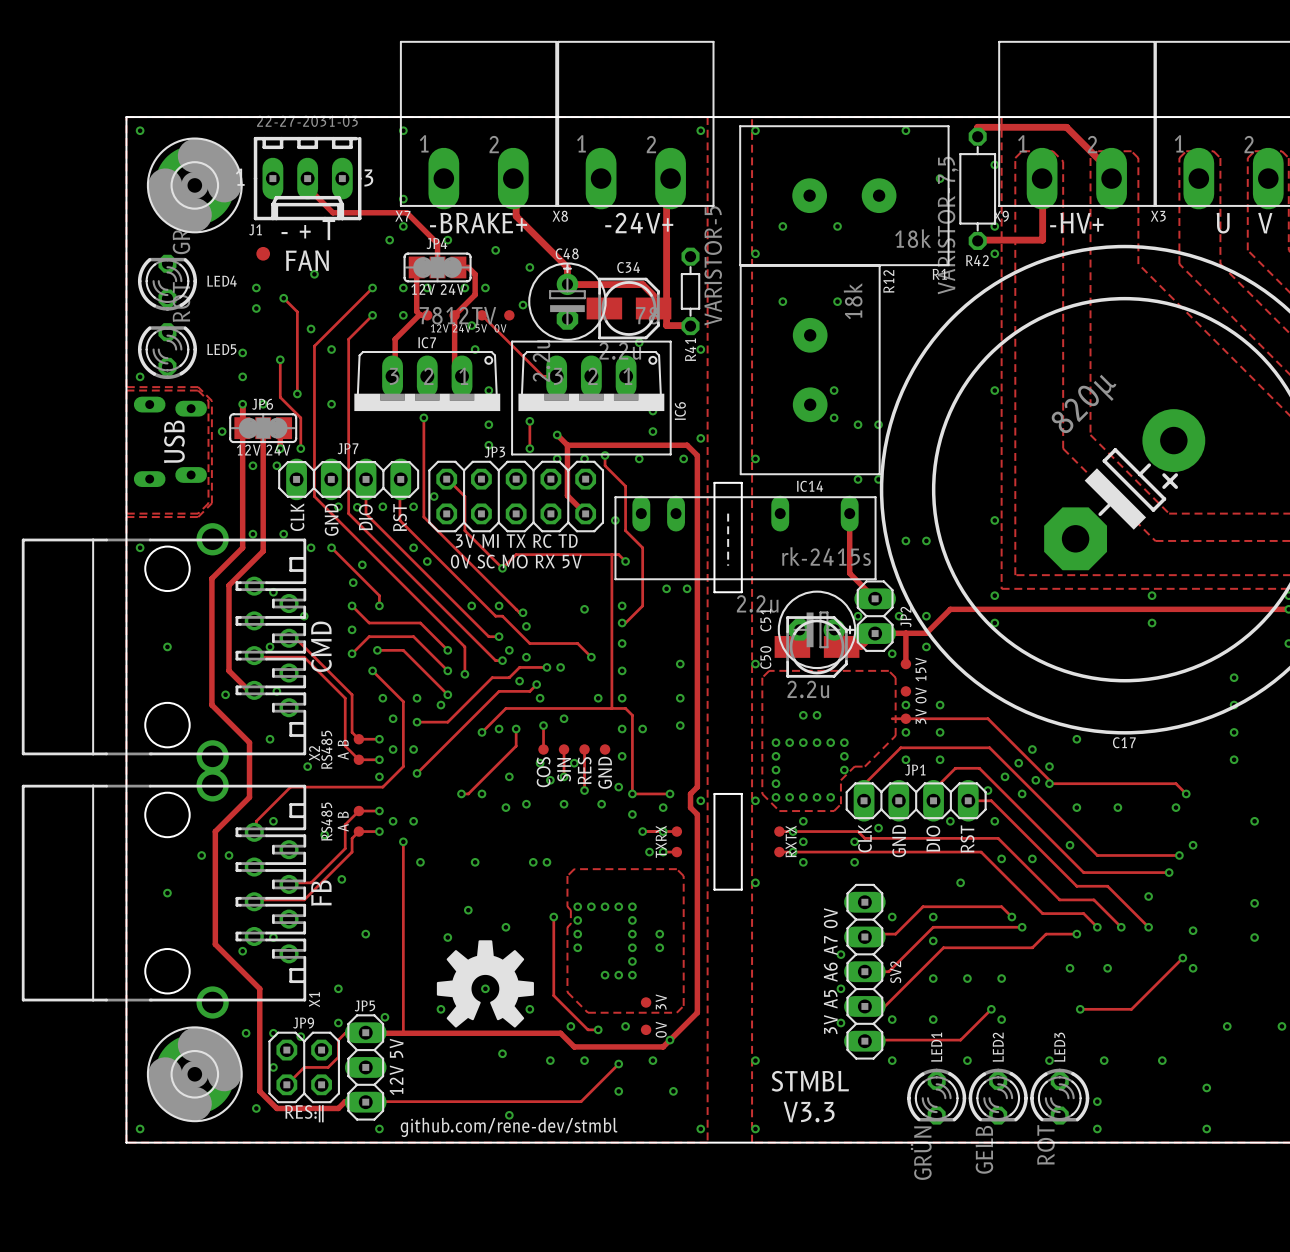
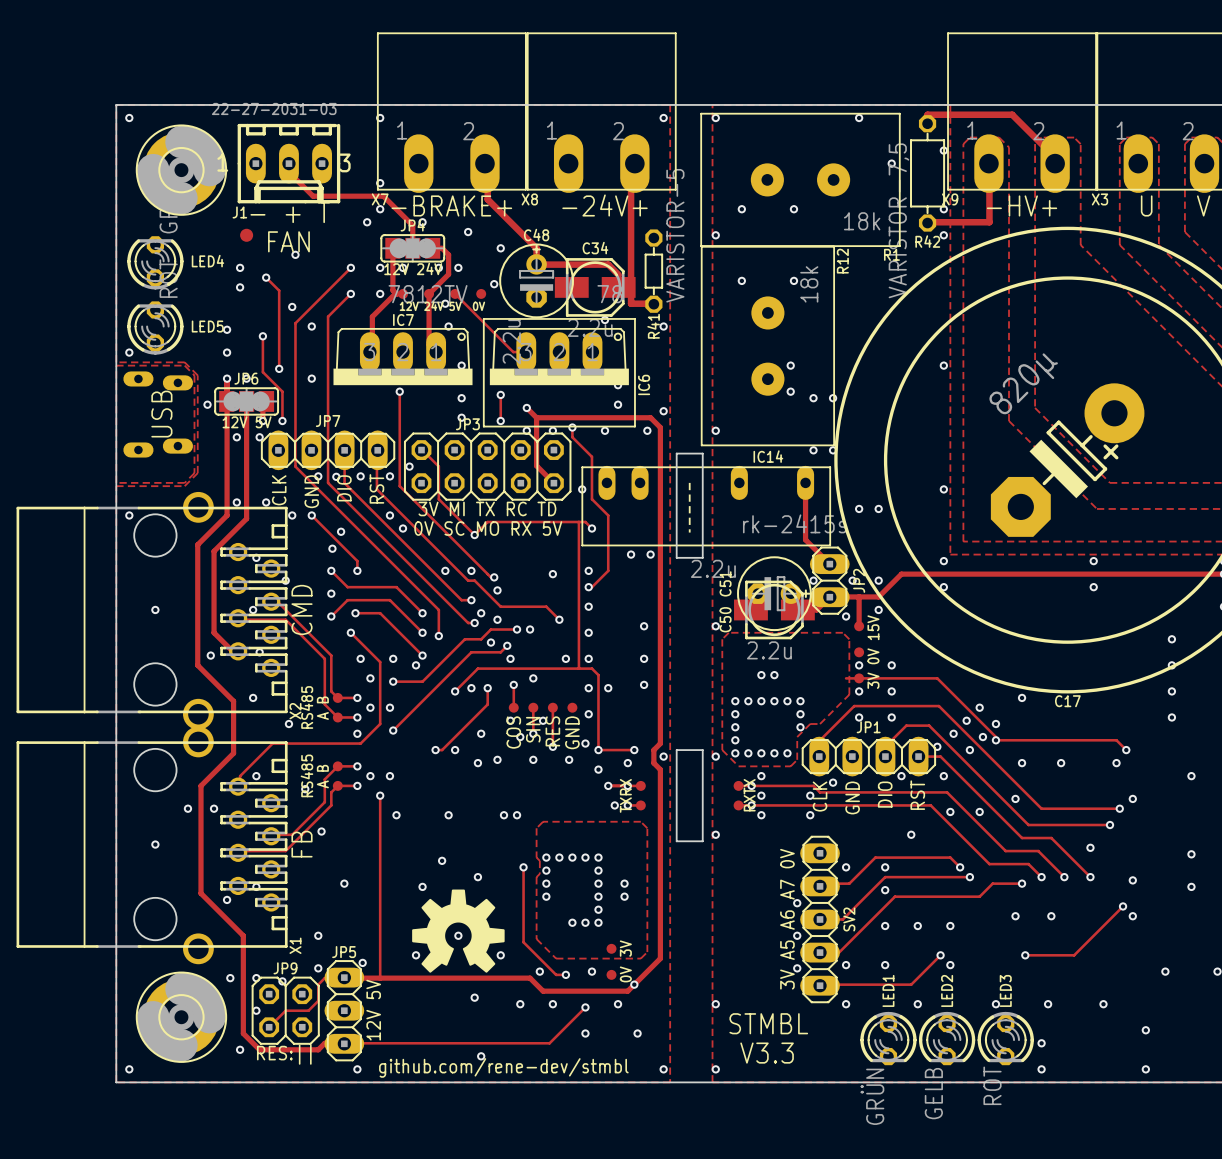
text: 12V 24V (263, 450) -> 12V 5V (247, 422)

